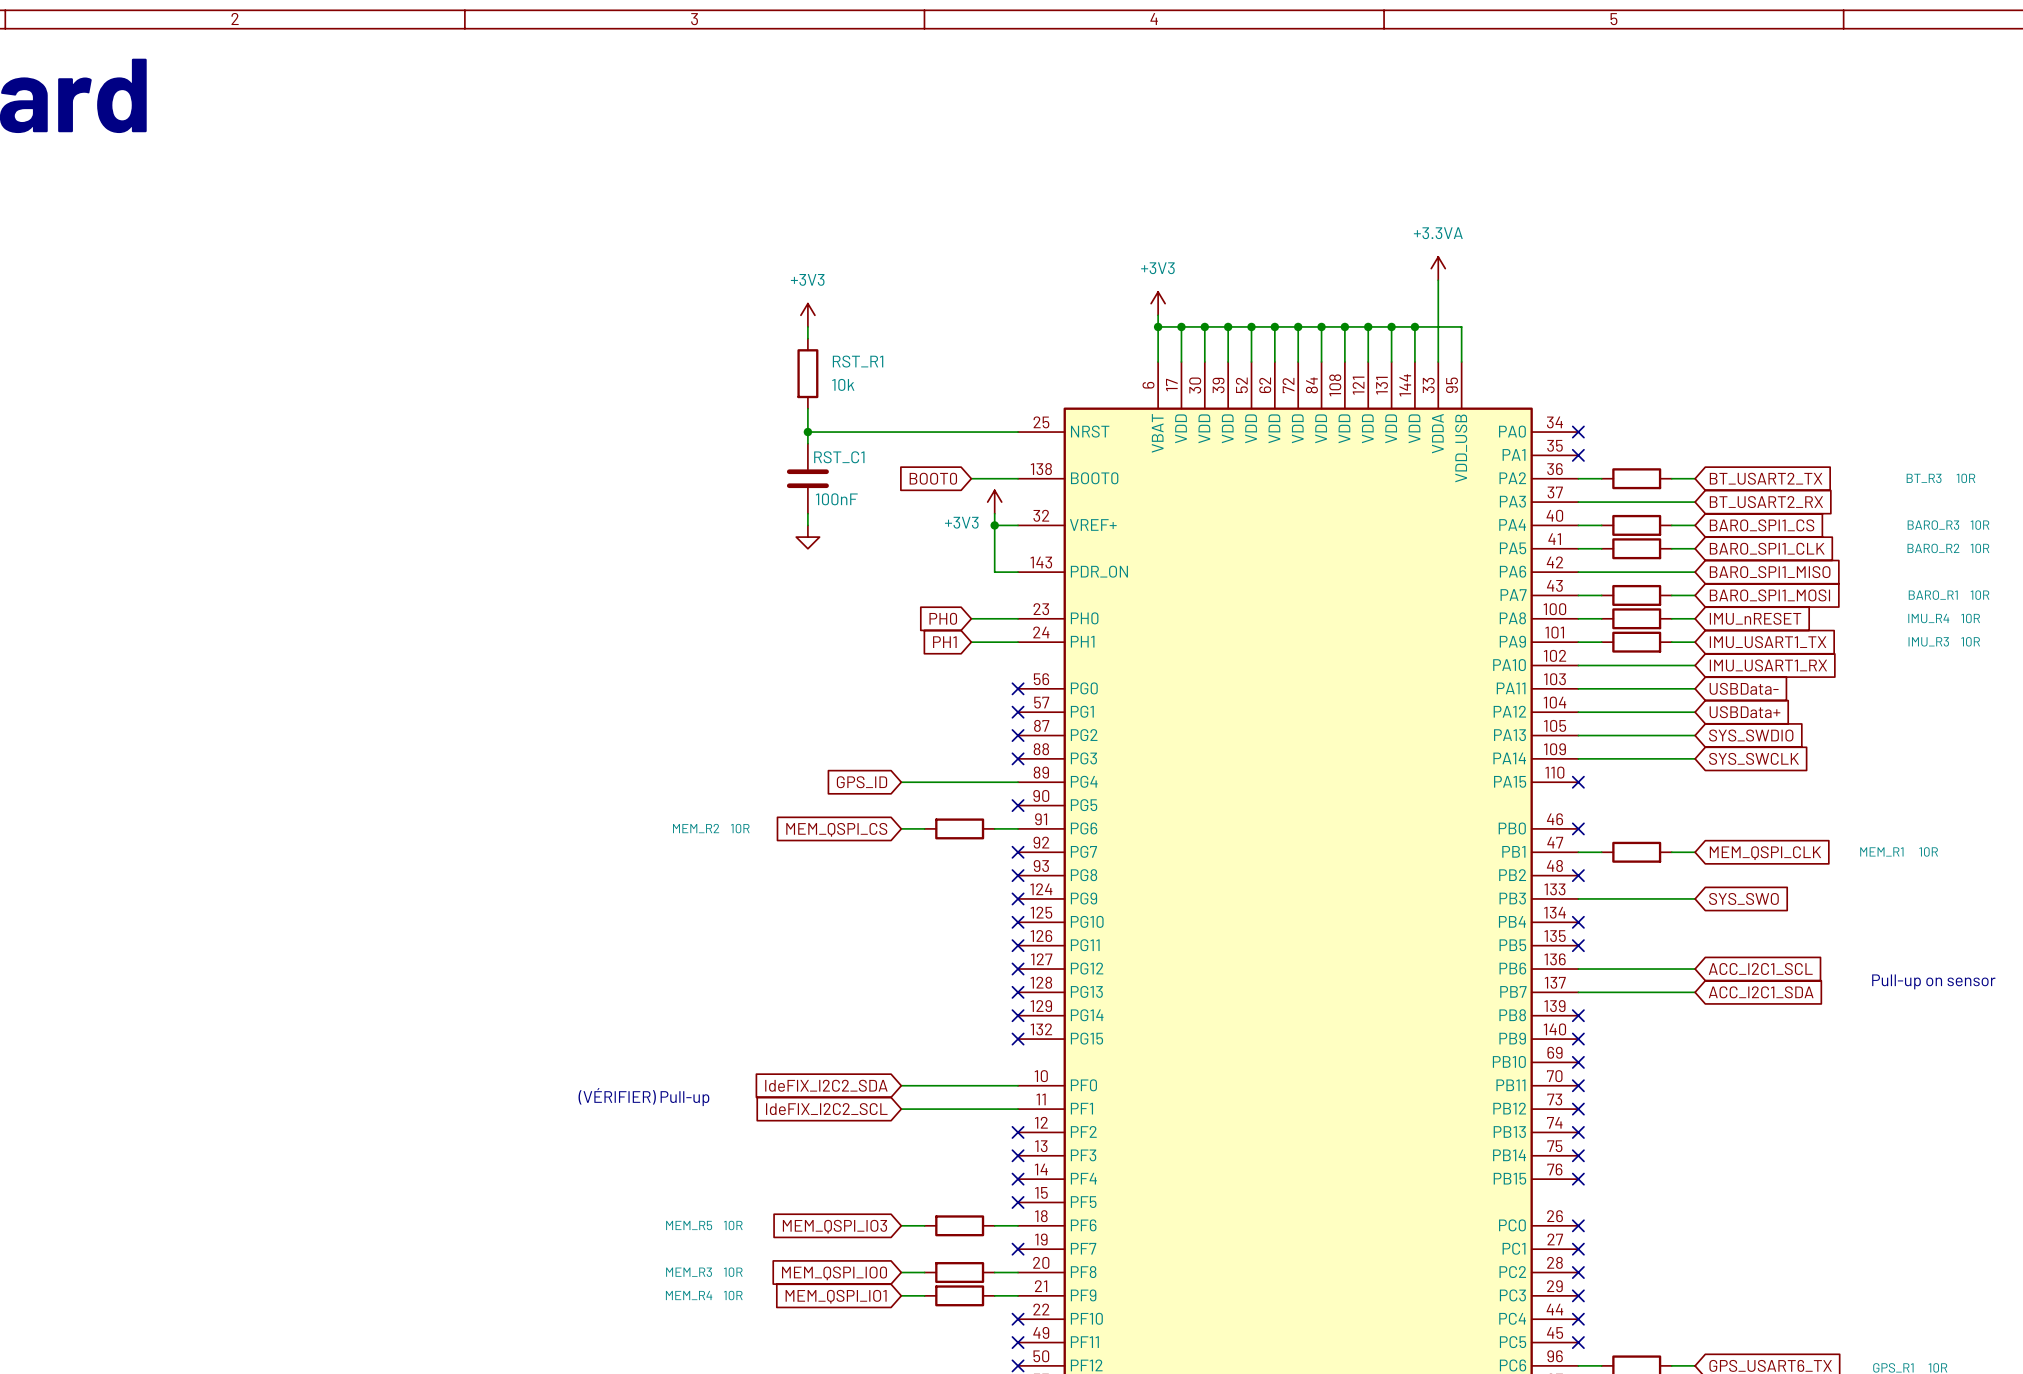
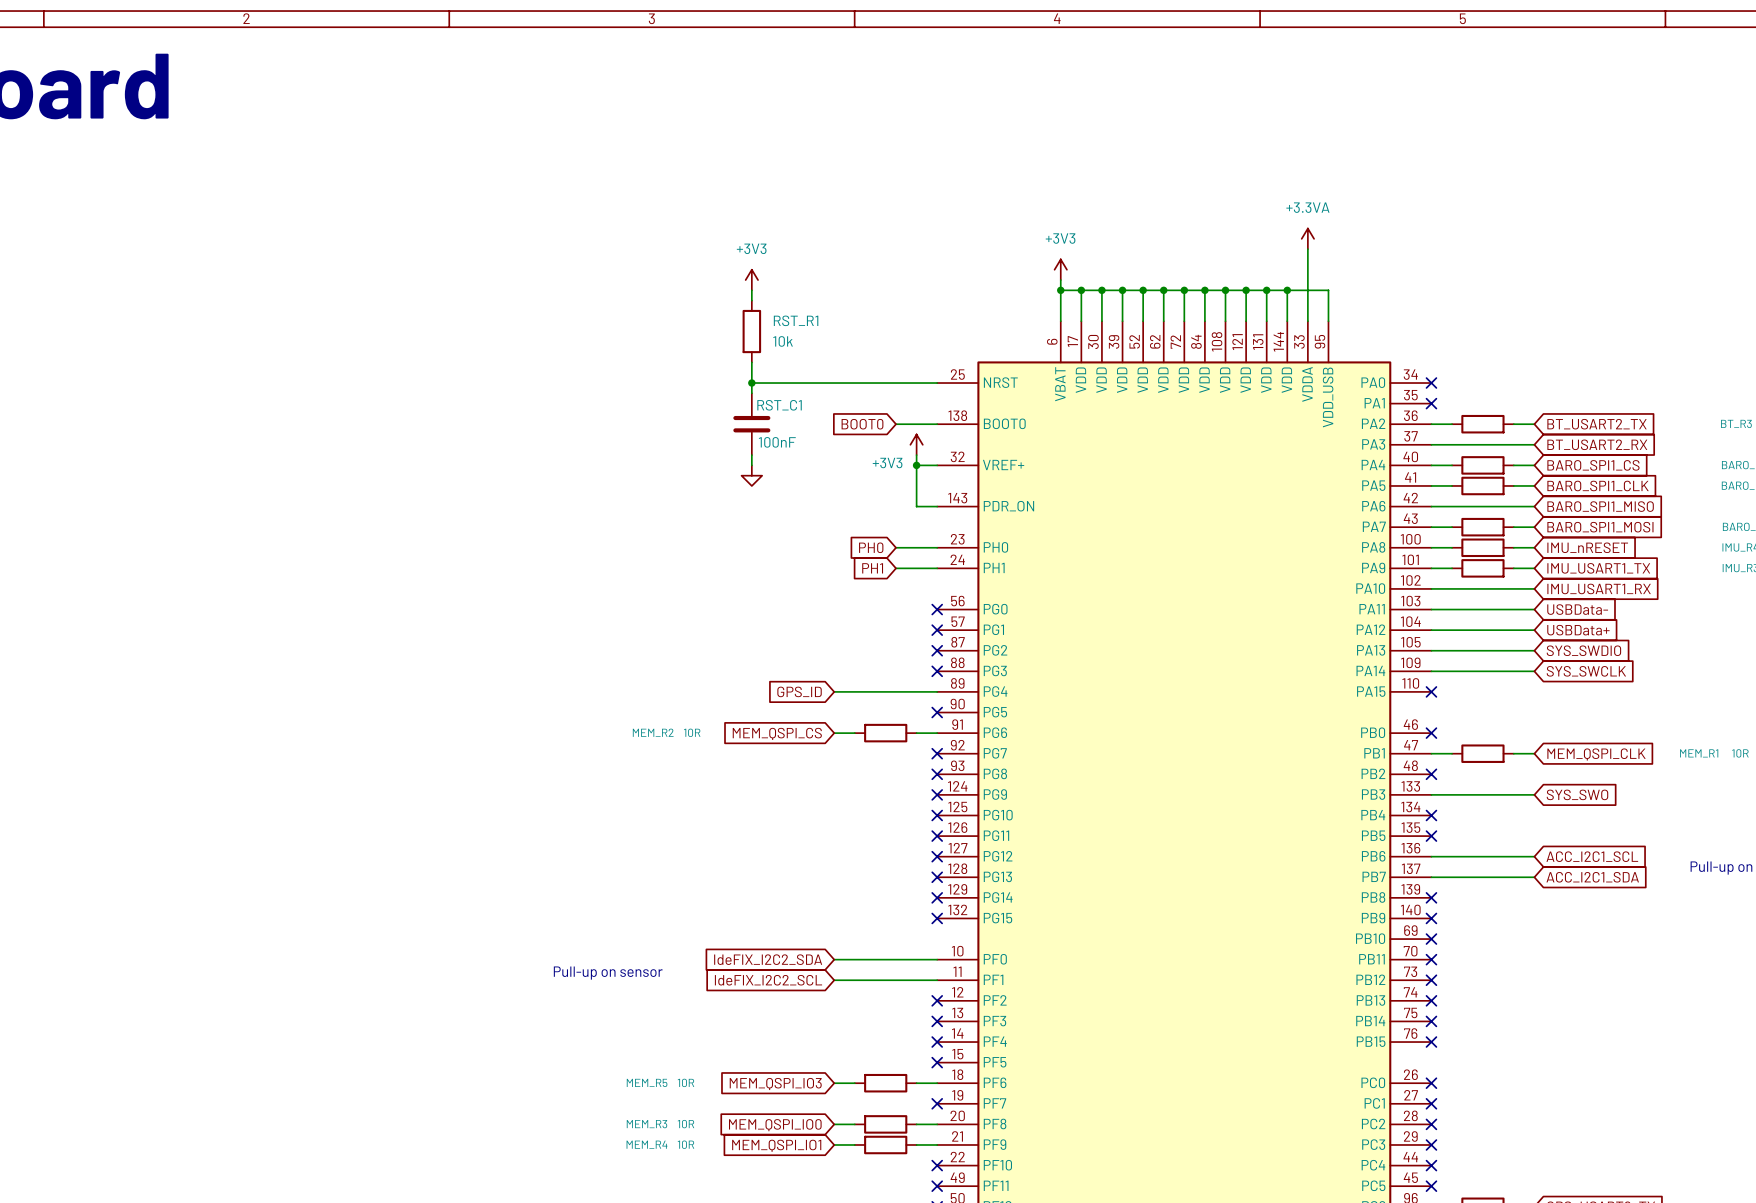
text: (VÉRIFIER) Pull-up (643, 1097) -> Pull-up on sensor (608, 973)

